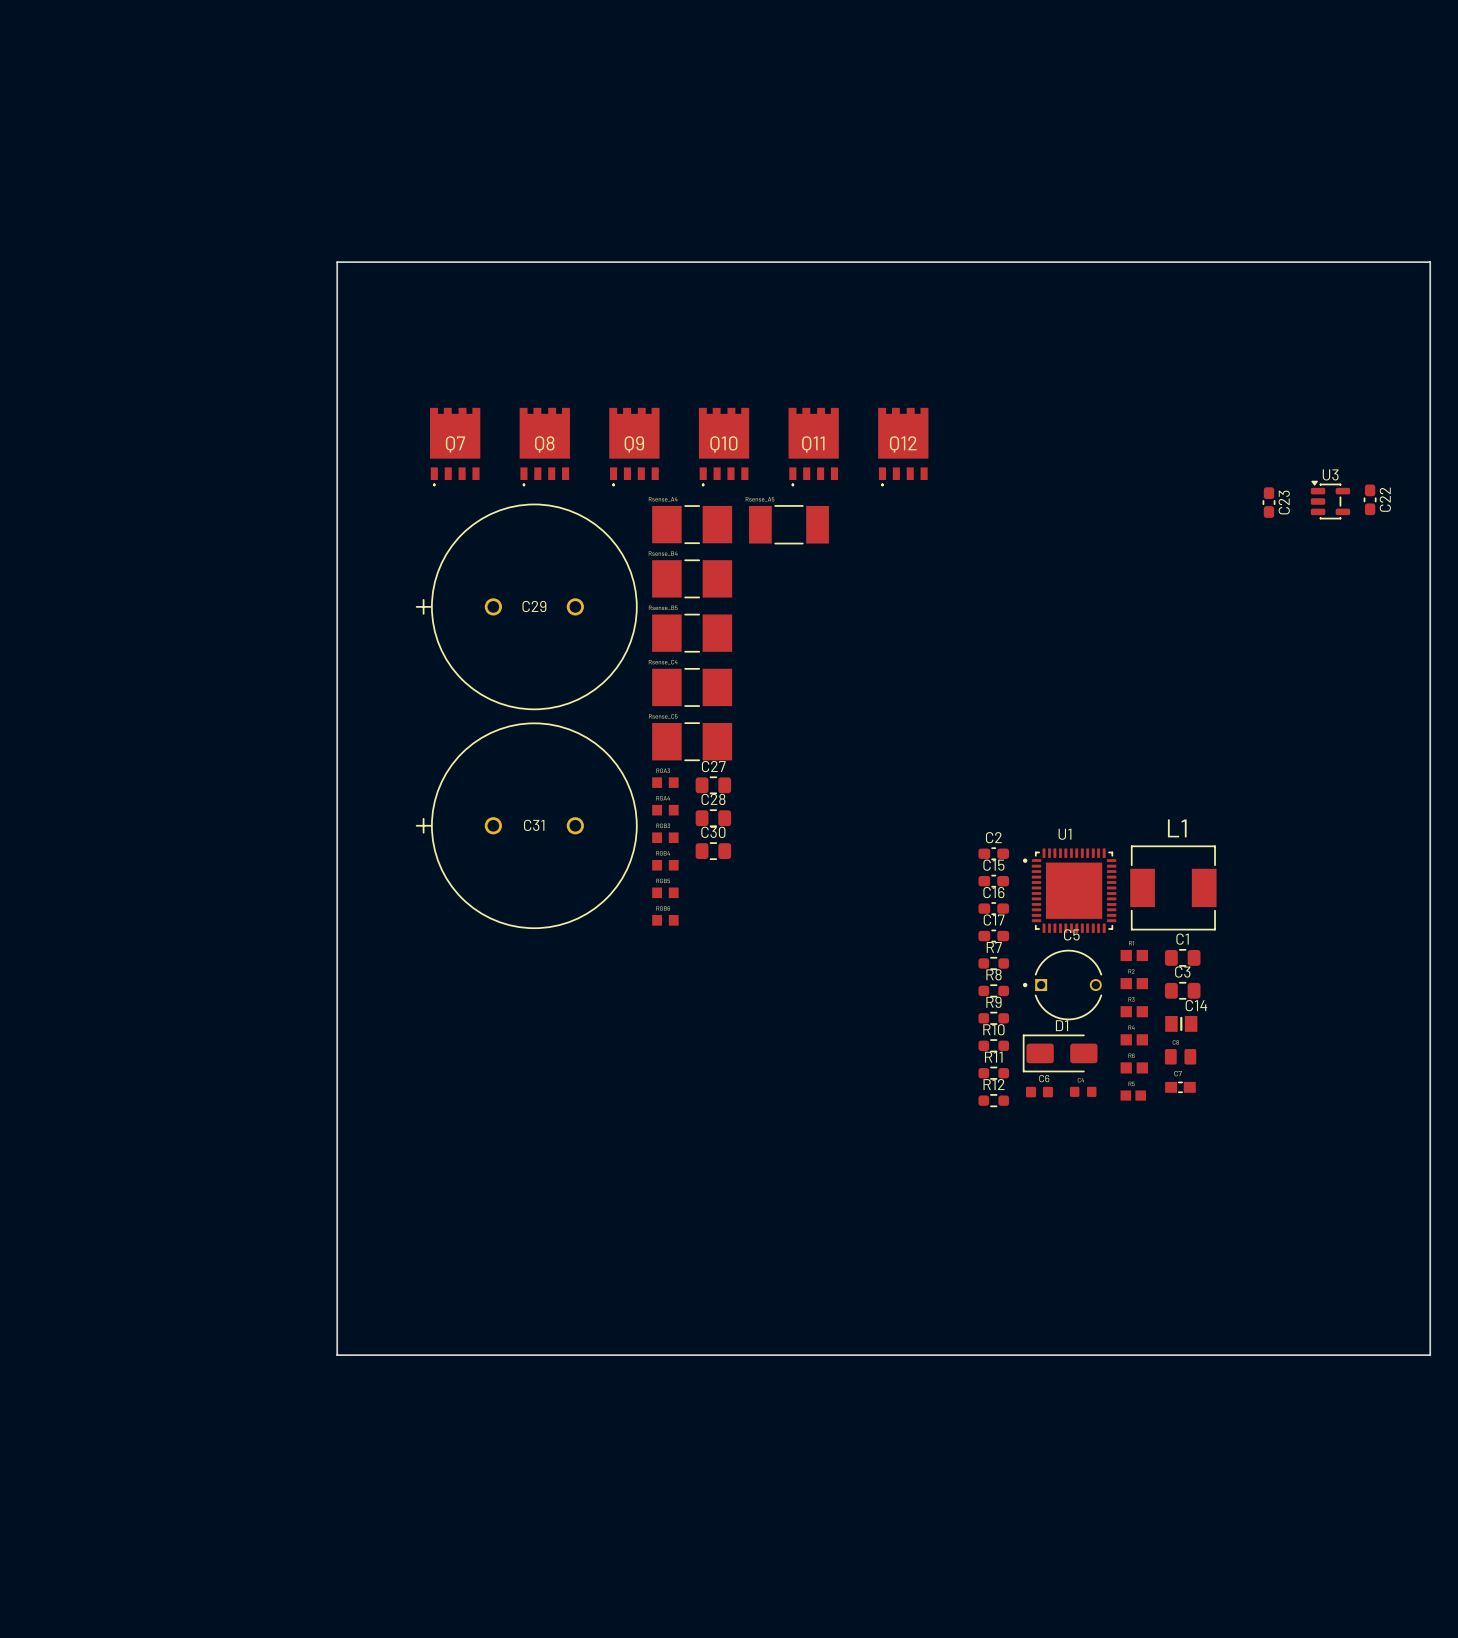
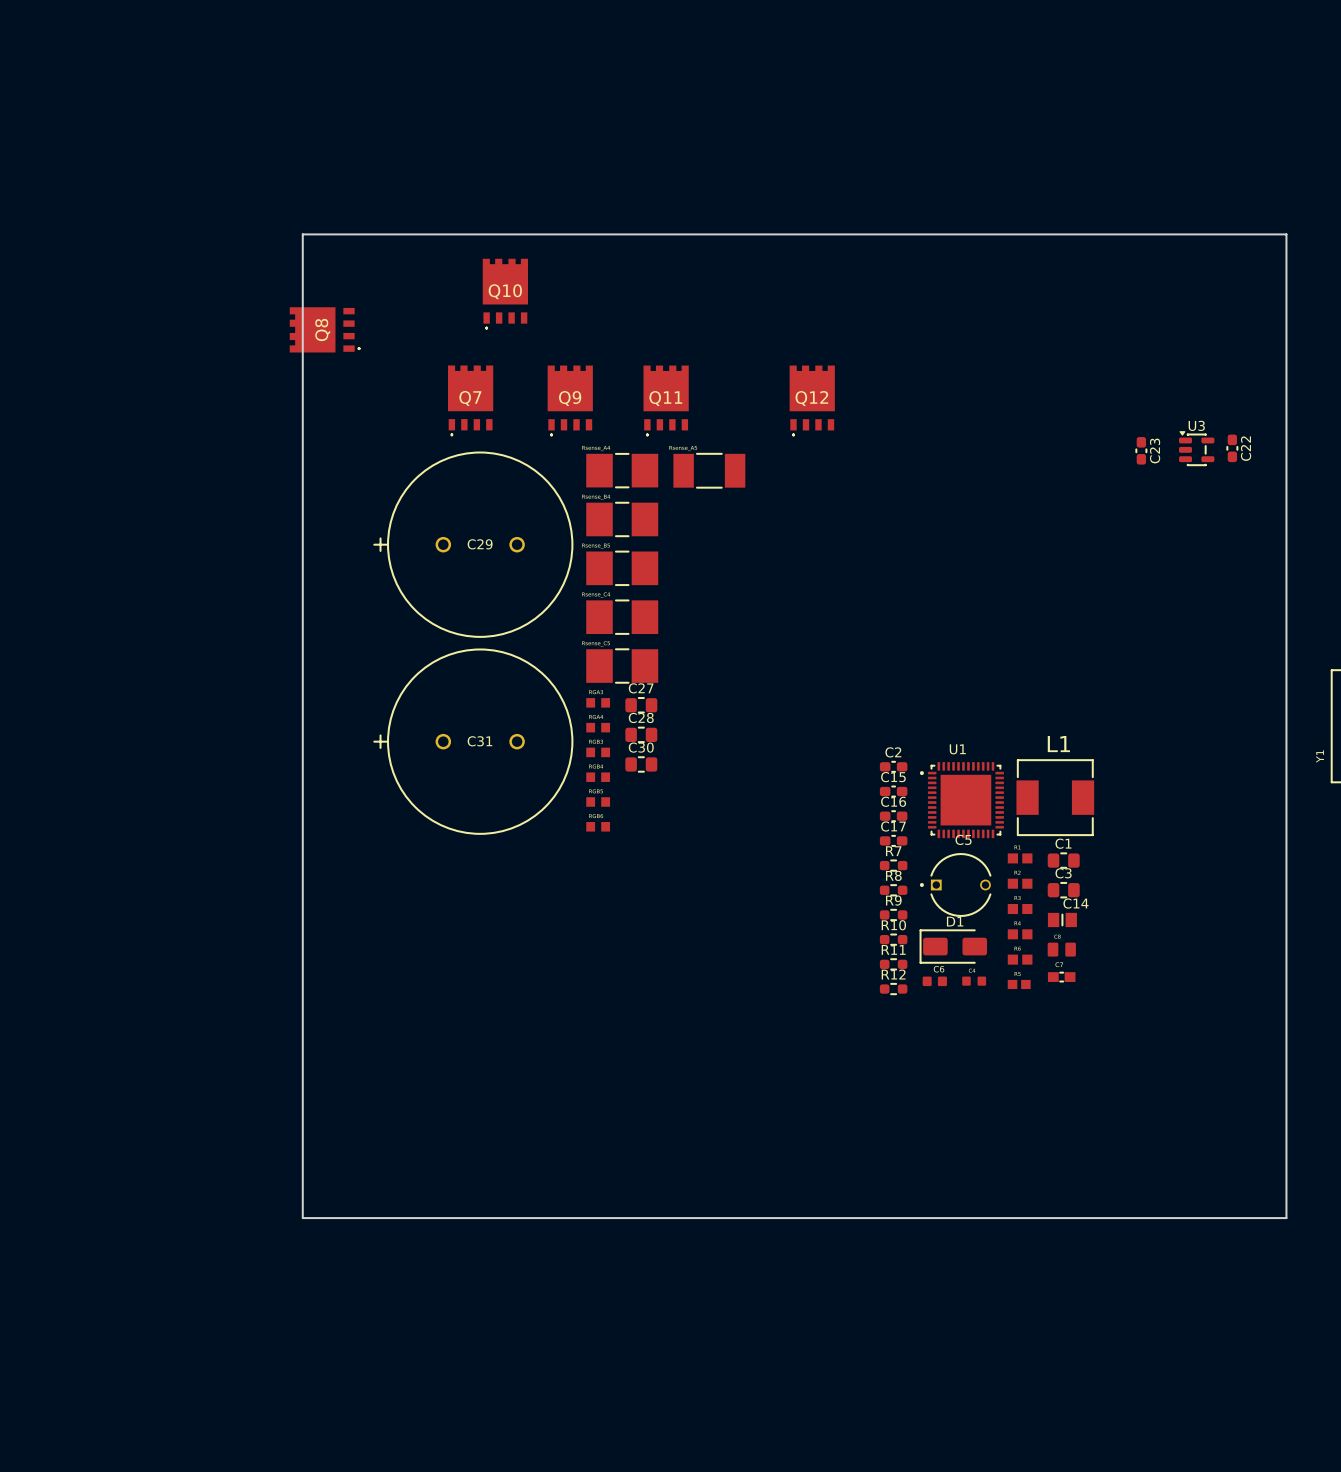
Q7 footprint: [430, 407, 481, 486] -> [447, 365, 494, 436]
Q8 footprint: [519, 407, 570, 486] -> [289, 307, 361, 353]
Q10 footprint: [698, 407, 750, 486] -> [482, 258, 529, 330]
Q11 footprint: [788, 407, 839, 486] -> [643, 365, 689, 436]

